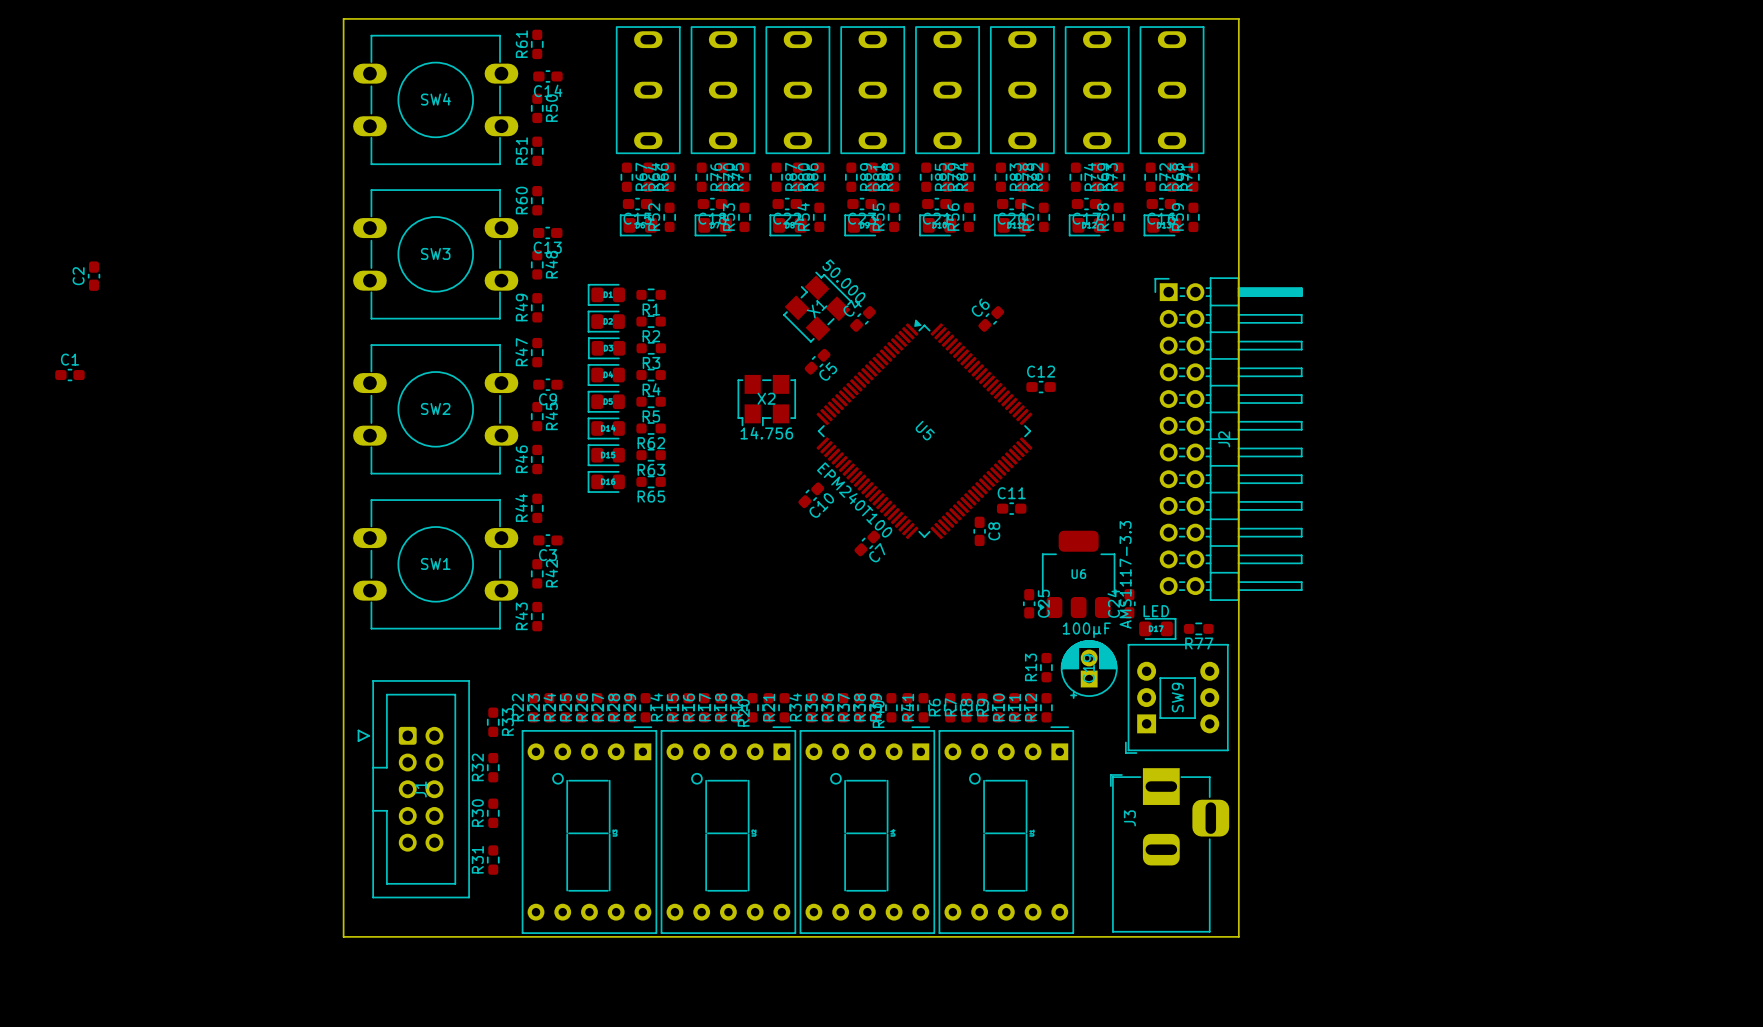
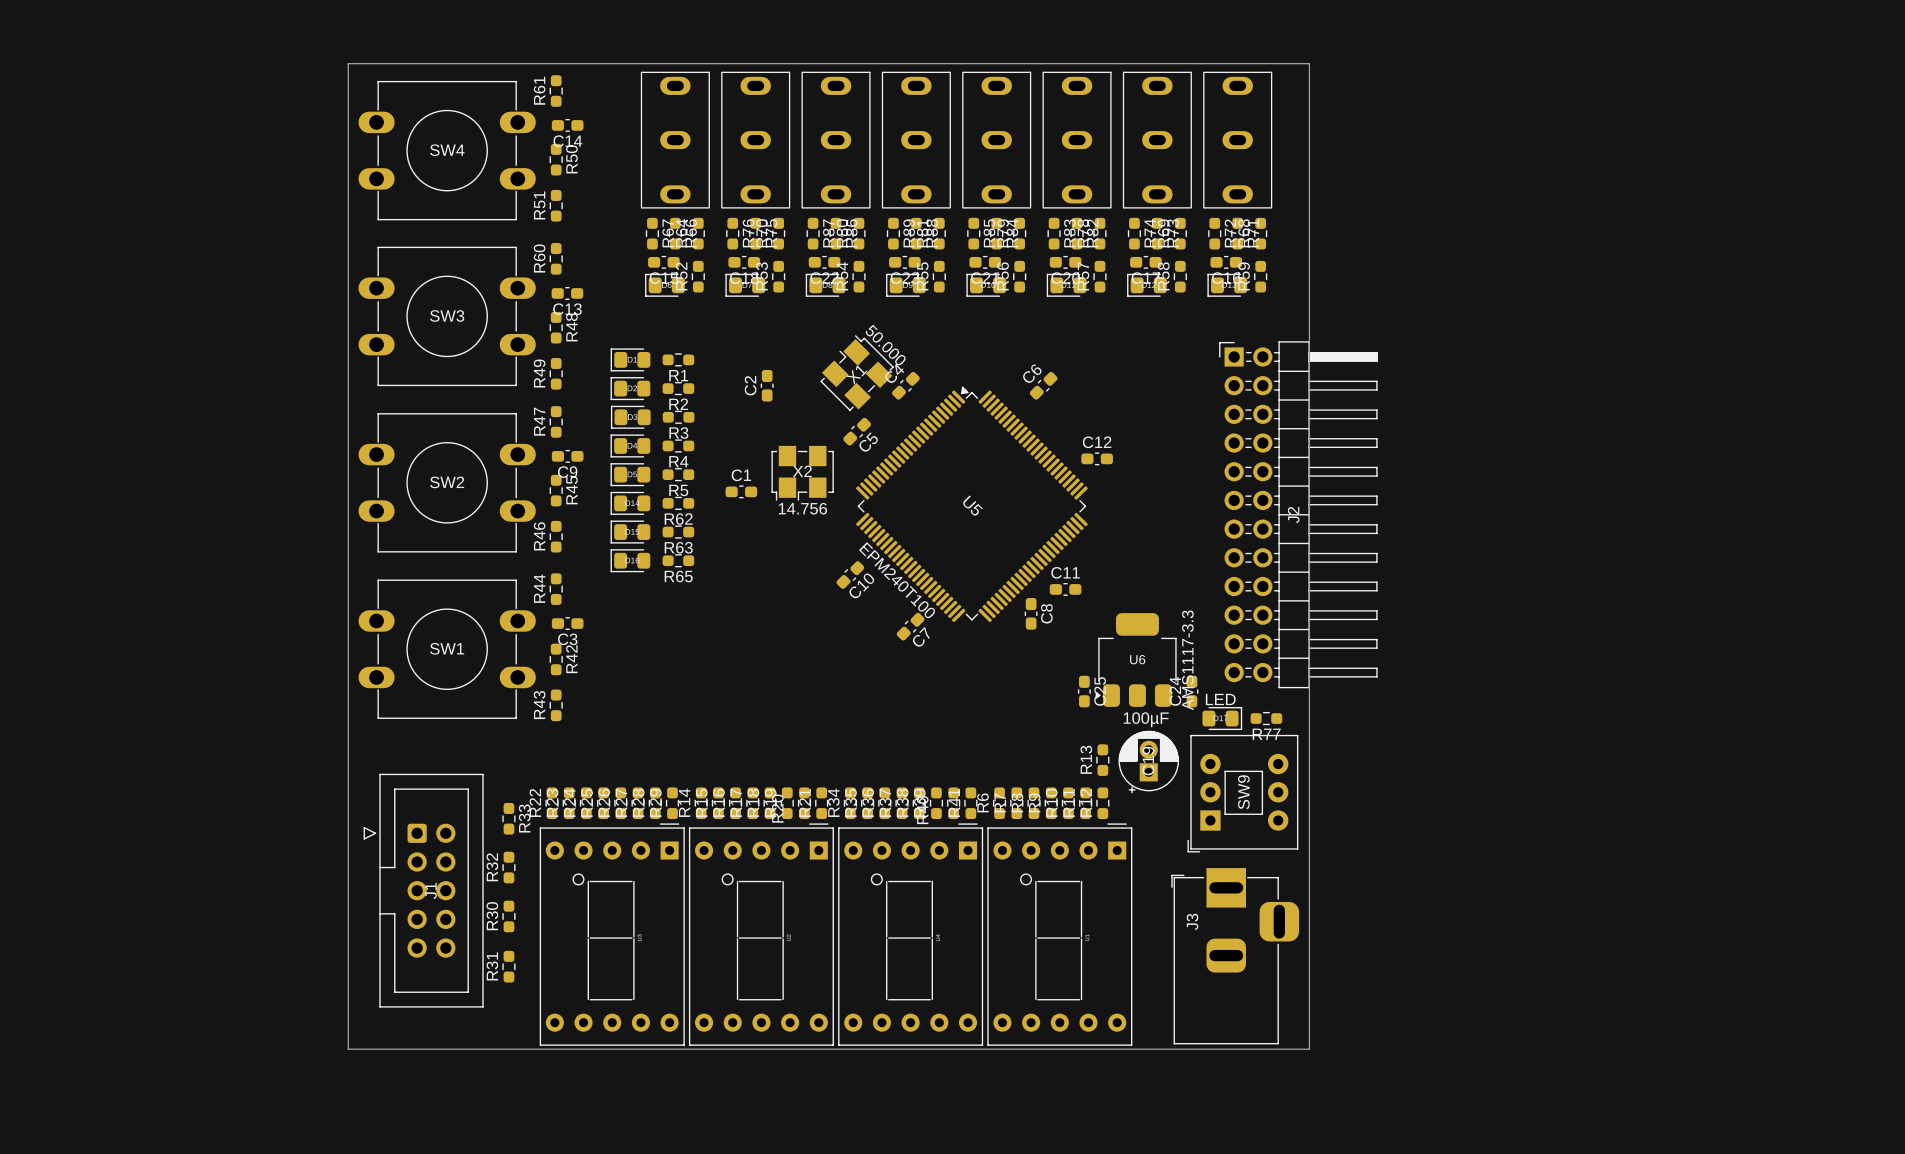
C2 position: (94, 276) -> (767, 385)
C1 position: (69, 375) -> (741, 491)

